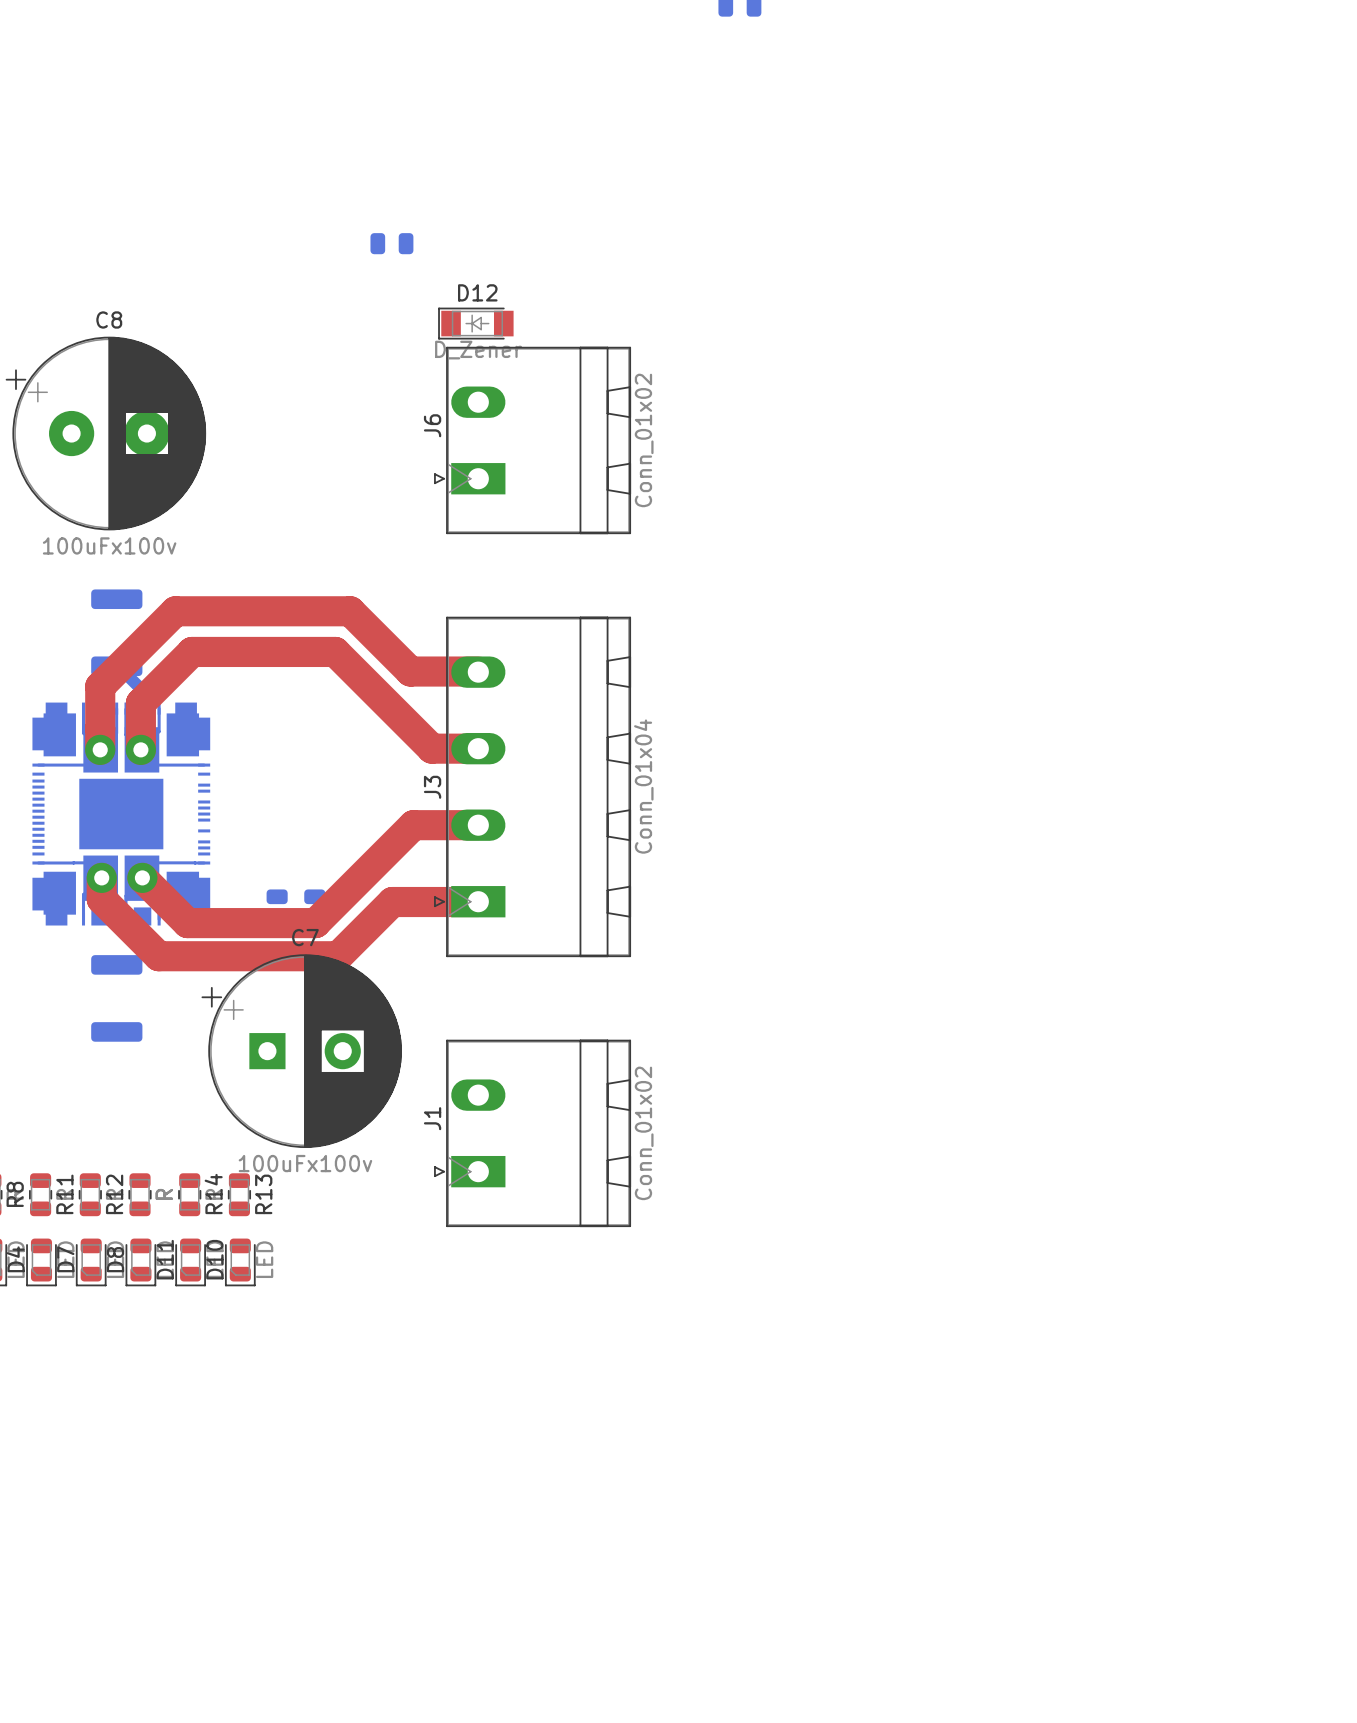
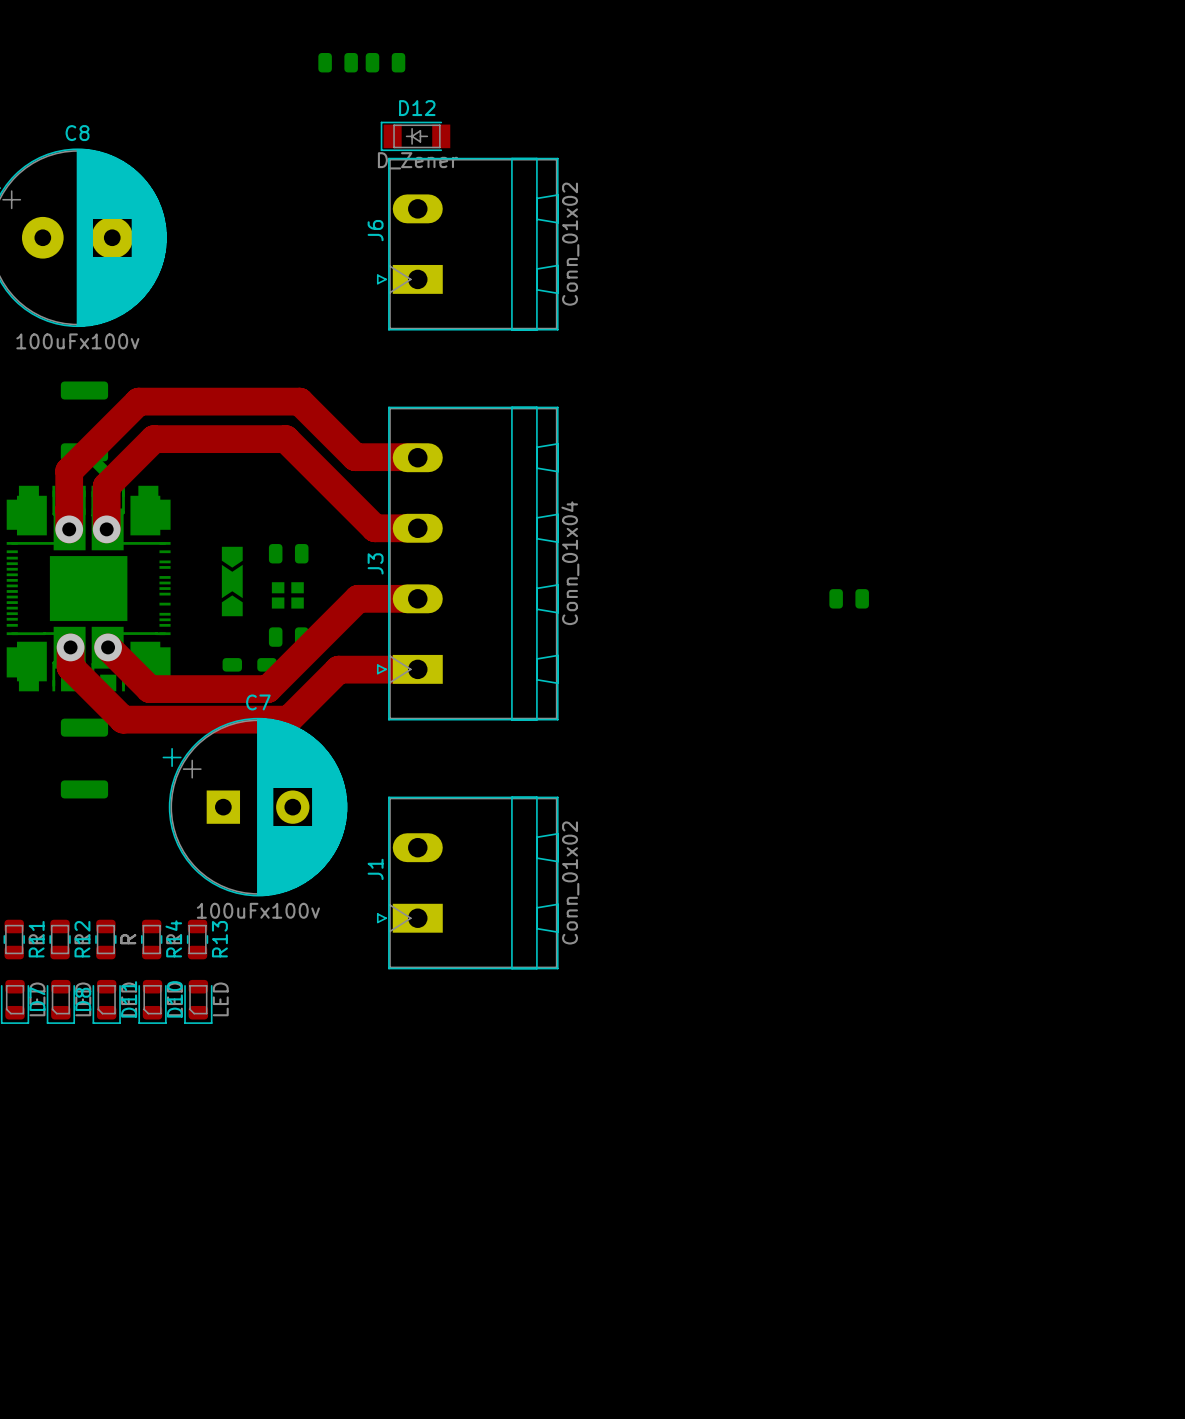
part: none -> (385, 62)
part: none -> (288, 553)
part: none -> (232, 581)
part: none -> (287, 595)
part: none -> (849, 598)
part: none -> (288, 637)

